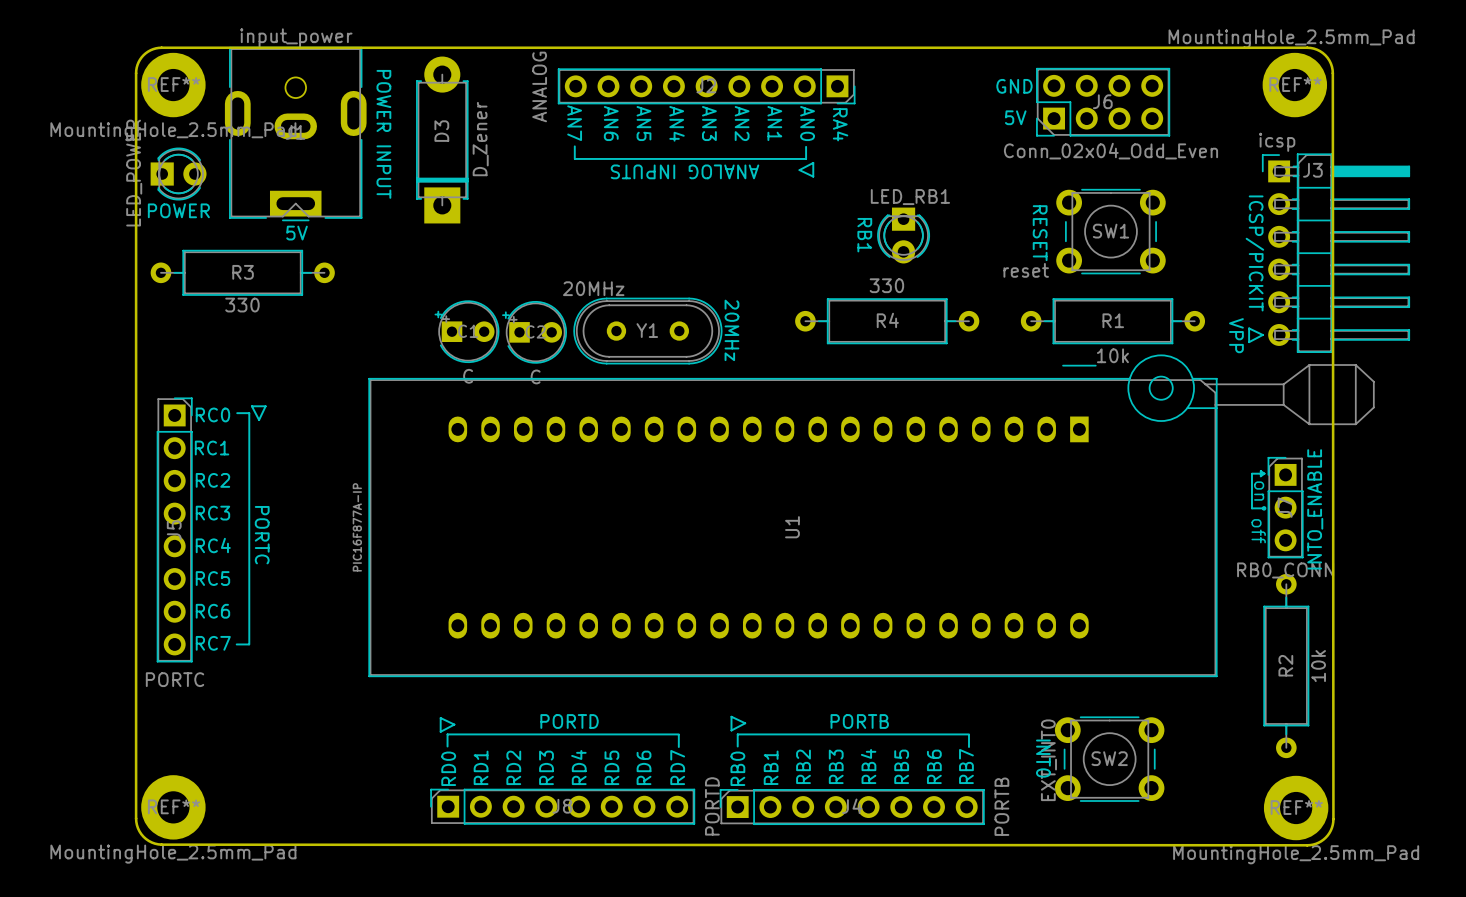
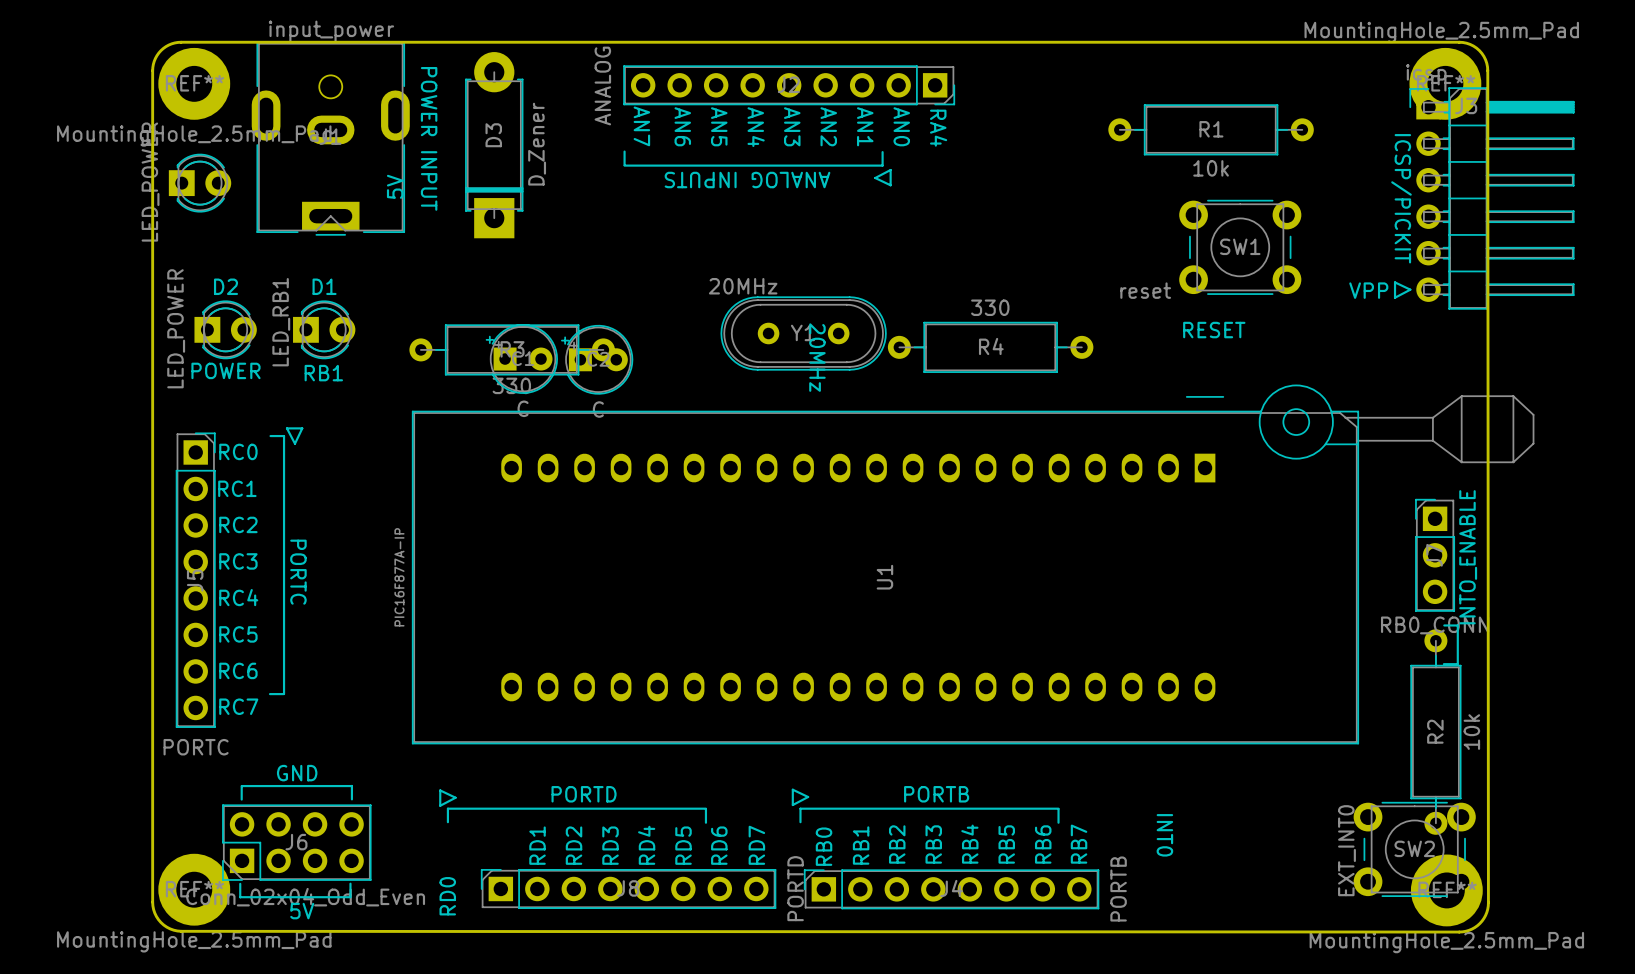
text: GND (1014, 86) -> none
J6 position: (1103, 102) -> (296, 842)
text: 5V (1015, 117) -> none
line: (574, 146) (574, 158) -> (624, 151) (624, 165)
line: (806, 146) (806, 158) (574, 158) -> (882, 152) (882, 165) (624, 165)
line: (813, 162) (799, 170) (813, 176) (813, 162) -> (890, 169) (875, 178) (890, 185) (890, 169)
text position: ANALOG INPUTS (685, 171) -> ANALOG INPUTS (747, 180)
text position: POWER (178, 210) -> POWER (225, 370)
text rotation: 0° (297, 233) -> 90° counterclockwise (395, 186)
text position: 5V (297, 233) -> 5V (395, 186)
text rotation: 0° (1040, 233) -> 90° counterclockwise (1214, 330)
text position: RESET (1040, 233) -> RESET (1214, 330)
text: RB1 (864, 235) -> none
part: LED_RB1 (903, 235) -> none
text position: ICSP/PICKIT (1254, 253) -> ICSP/PICKIT (1401, 198)
J3 position: (1335, 253) -> (1491, 198)
R3 position: (242, 272) -> (512, 349)
D2: none -> LED_POWER (225, 329)
D1: none -> LED_RB1 (324, 329)
R1 position: (1112, 321) -> (1211, 129)
line: (1249, 328) (1262, 334) (1249, 342) (1249, 328) -> (1395, 282) (1410, 289) (1395, 297) (1395, 282)
Y1 position: (647, 331) -> (803, 333)
text rotation: 0° (1236, 335) -> 90° counterclockwise (1368, 290)
text position: VPP (1236, 335) -> VPP (1368, 290)
text: none -> RB1 (323, 373)
line: (251, 406) (259, 420) (265, 406) (251, 406) -> (286, 428) (294, 443) (302, 428) (286, 428)
line: (237, 413) (249, 413) (249, 644) -> (270, 436) (284, 436) (284, 694)
line: (1251, 473) (1251, 508) (1264, 508) -> none
line: (1252, 473) (1264, 473) -> (1443, 664) (1457, 664)
line: (1264, 473) (1260, 476) (1260, 471) (1264, 473) -> none
text: on (1259, 491) -> none
drawing: [1261, 506, 1267, 511] -> none
text: off (1258, 531) -> none
text position: PORTC (262, 535) -> PORTC (298, 572)
line: none -> (1444, 625) (1457, 625) (1457, 664)
line: (236, 644) (248, 644) -> (269, 694) (283, 694)
text: none -> GND (297, 773)
line: none -> (241, 786) (241, 799)
line: none -> (241, 786) (351, 786)
line: none -> (351, 785) (351, 799)
line: (731, 716) (731, 730) (745, 723) (731, 716) -> (792, 789) (792, 805) (808, 797) (792, 789)
line: (440, 718) (440, 731) (454, 724) (440, 718) -> (440, 790) (440, 805) (455, 797) (440, 790)
text position: PORTD (569, 721) -> PORTD (584, 794)
text position: PORTB (859, 721) -> PORTB (936, 794)
line: (678, 734) (447, 734) (447, 746) -> (705, 808) (447, 808) (447, 822)
line: (678, 734) (678, 747) -> (705, 809) (705, 822)
line: (969, 734) (737, 734) (737, 746) -> (1058, 808) (800, 808) (800, 822)
line: (969, 734) (969, 747) -> (1058, 809) (1058, 822)
SW2 position: (1109, 759) -> (1414, 849)
text position: RD0 (448, 768) -> RD0 (447, 896)
line: none -> (350, 883) (350, 897)
line: none -> (240, 883) (240, 897)
line: none -> (240, 897) (350, 897)
text: none -> 5V (302, 911)

